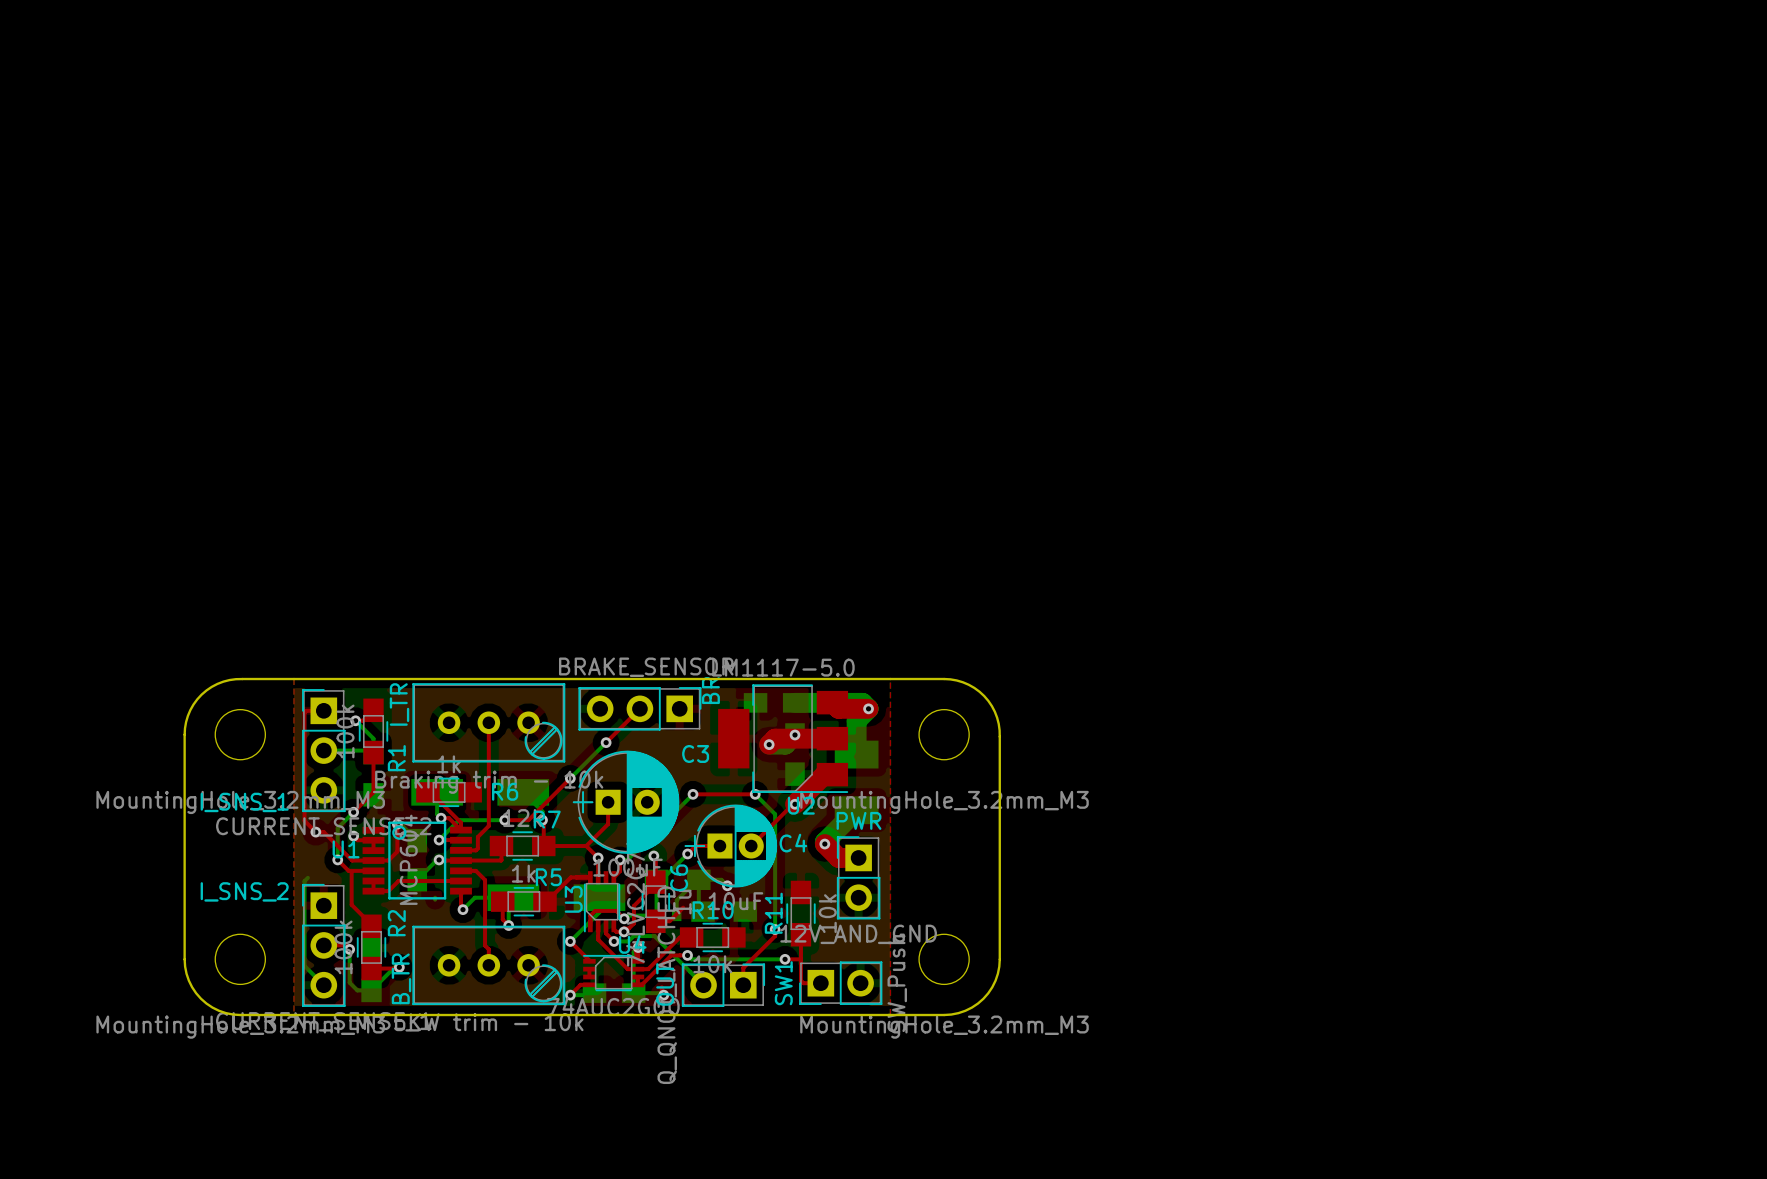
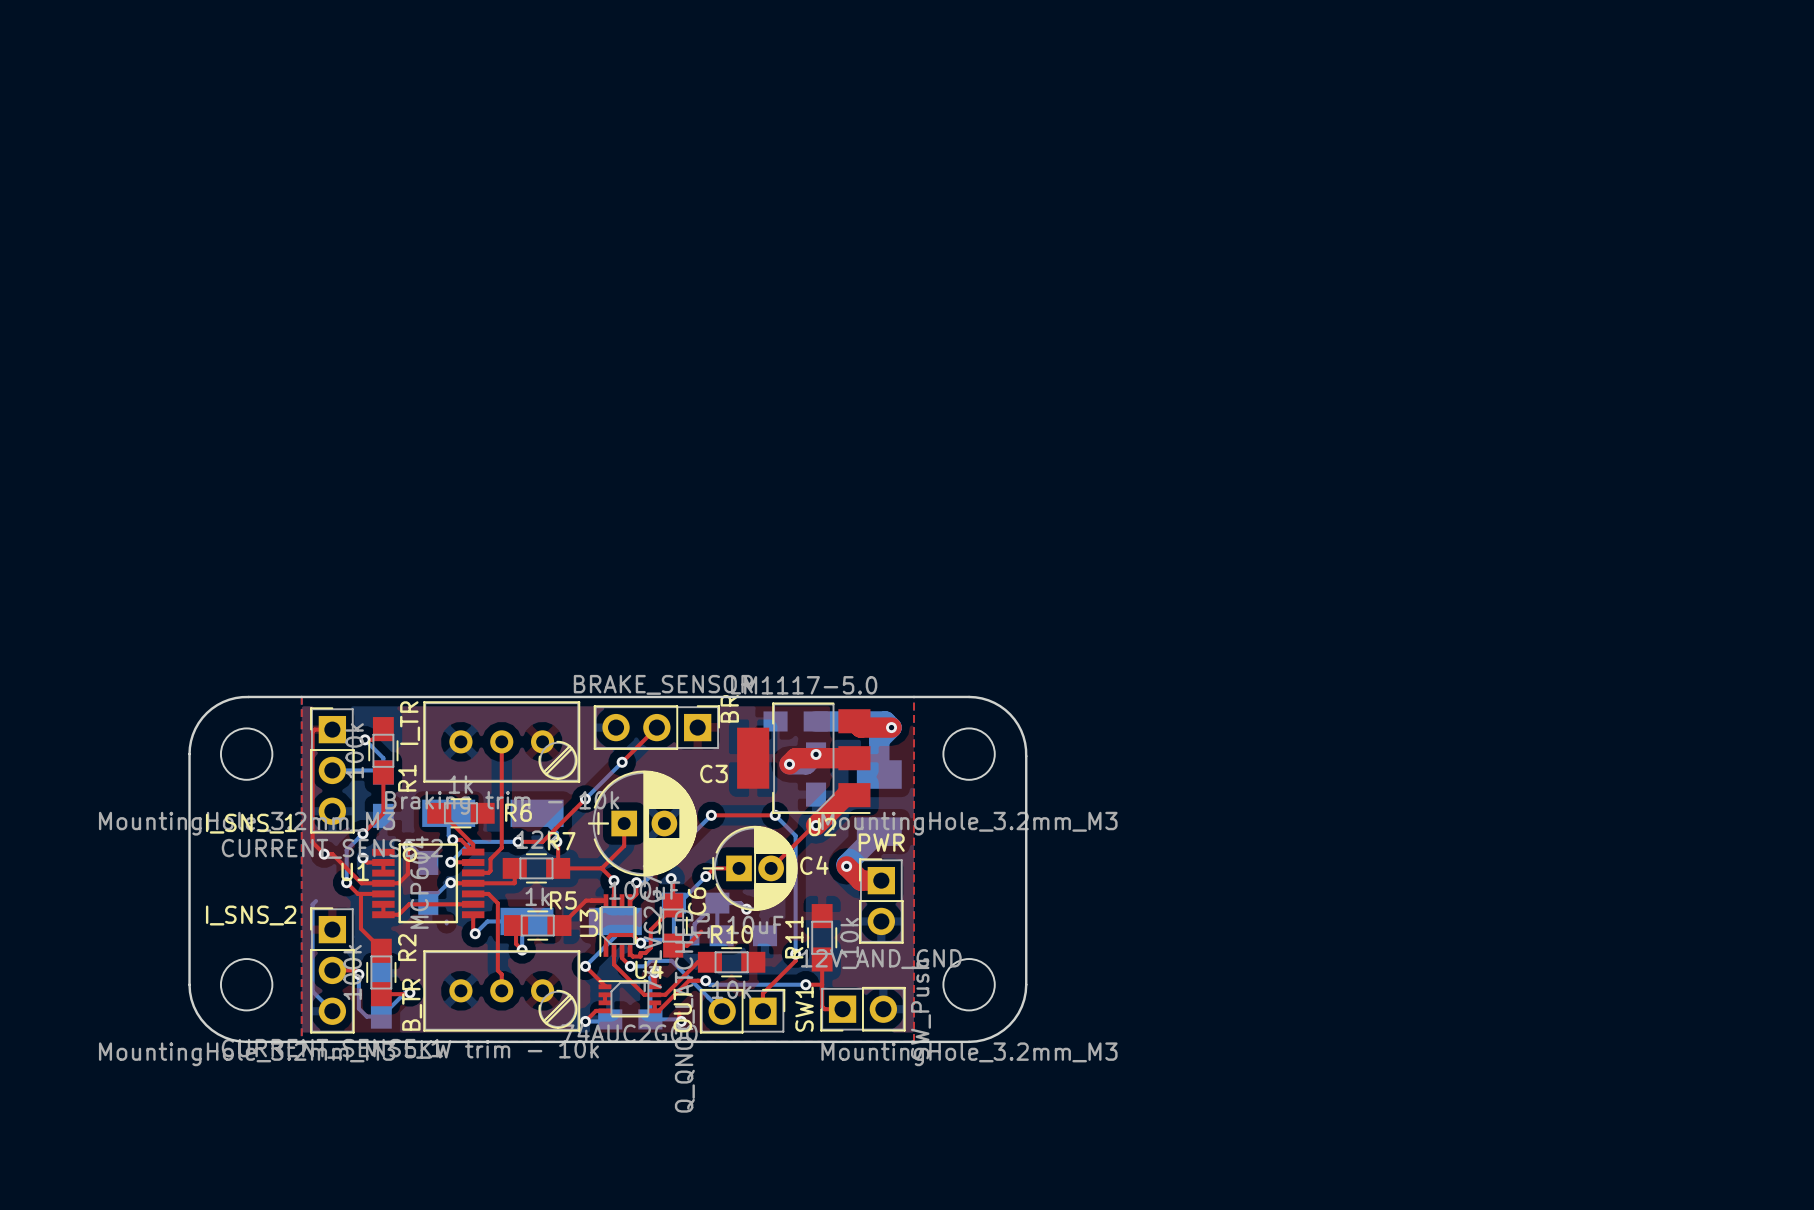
via: (624, 931) -> none

